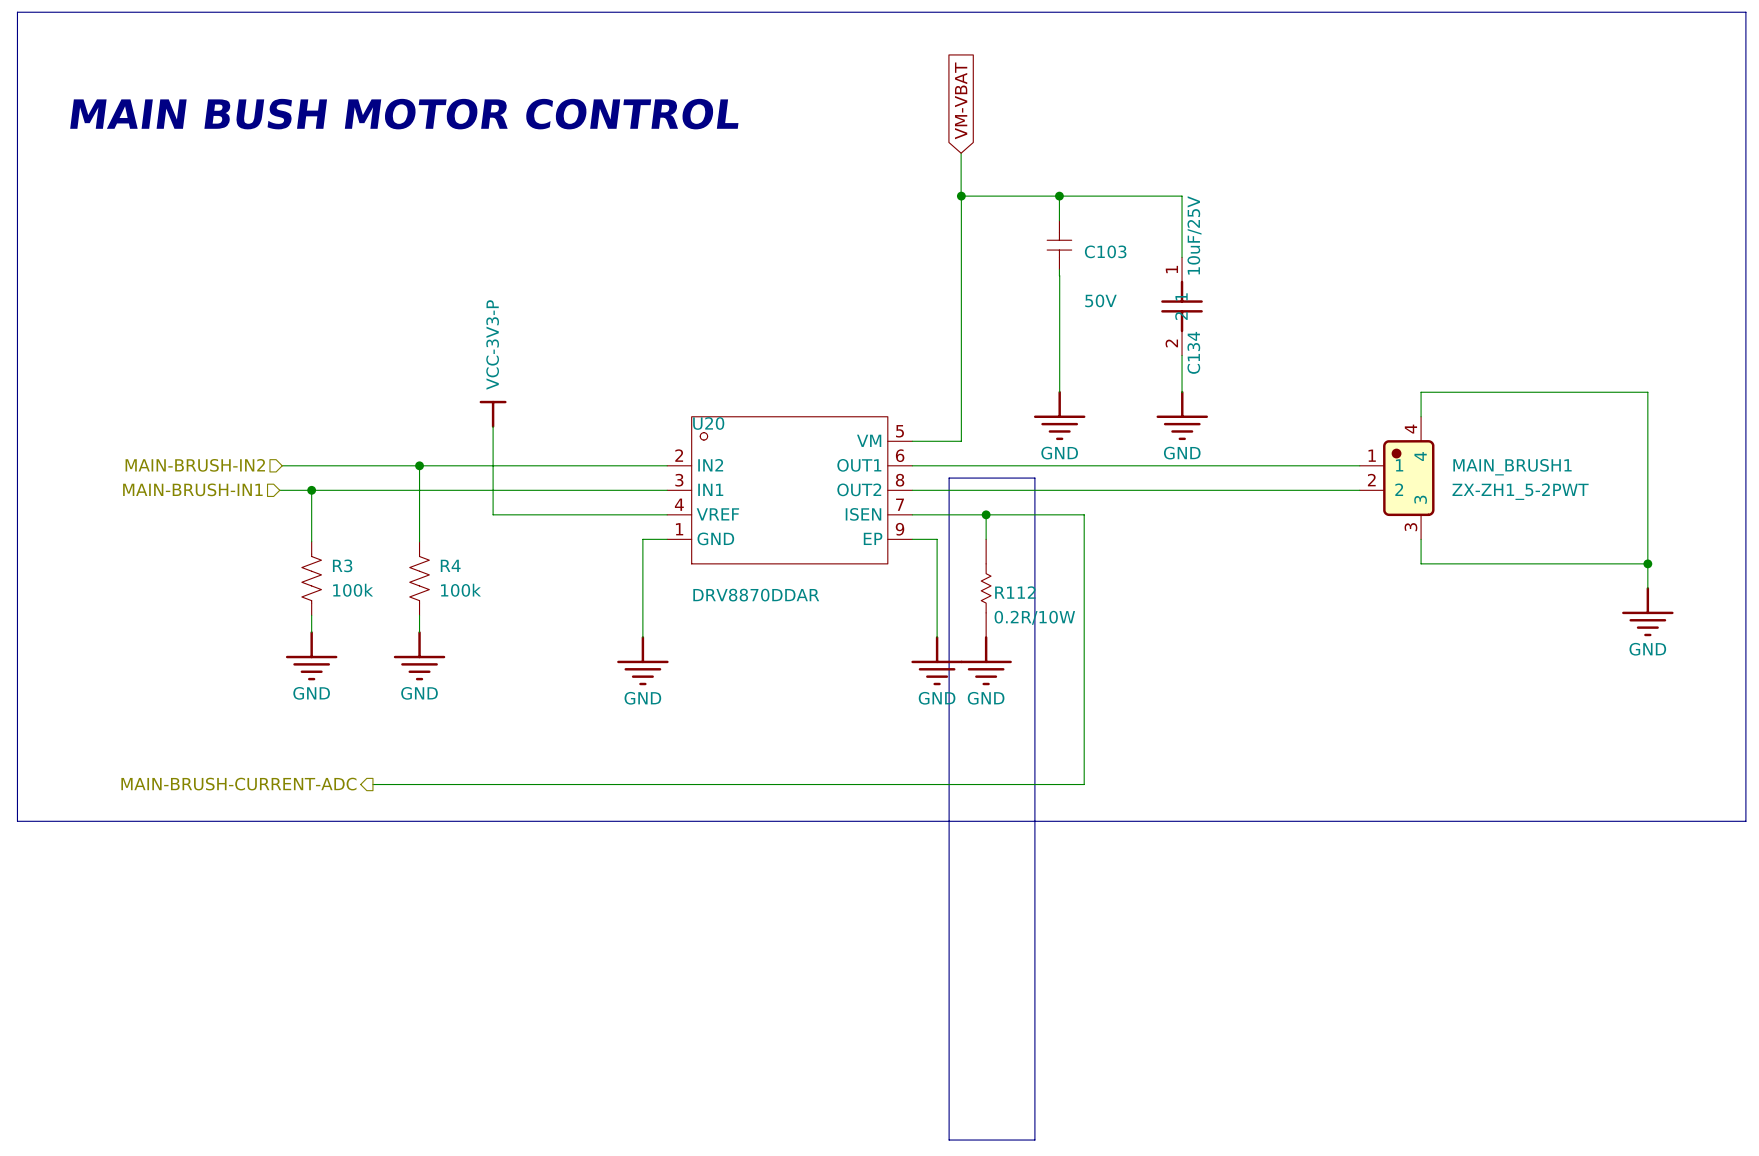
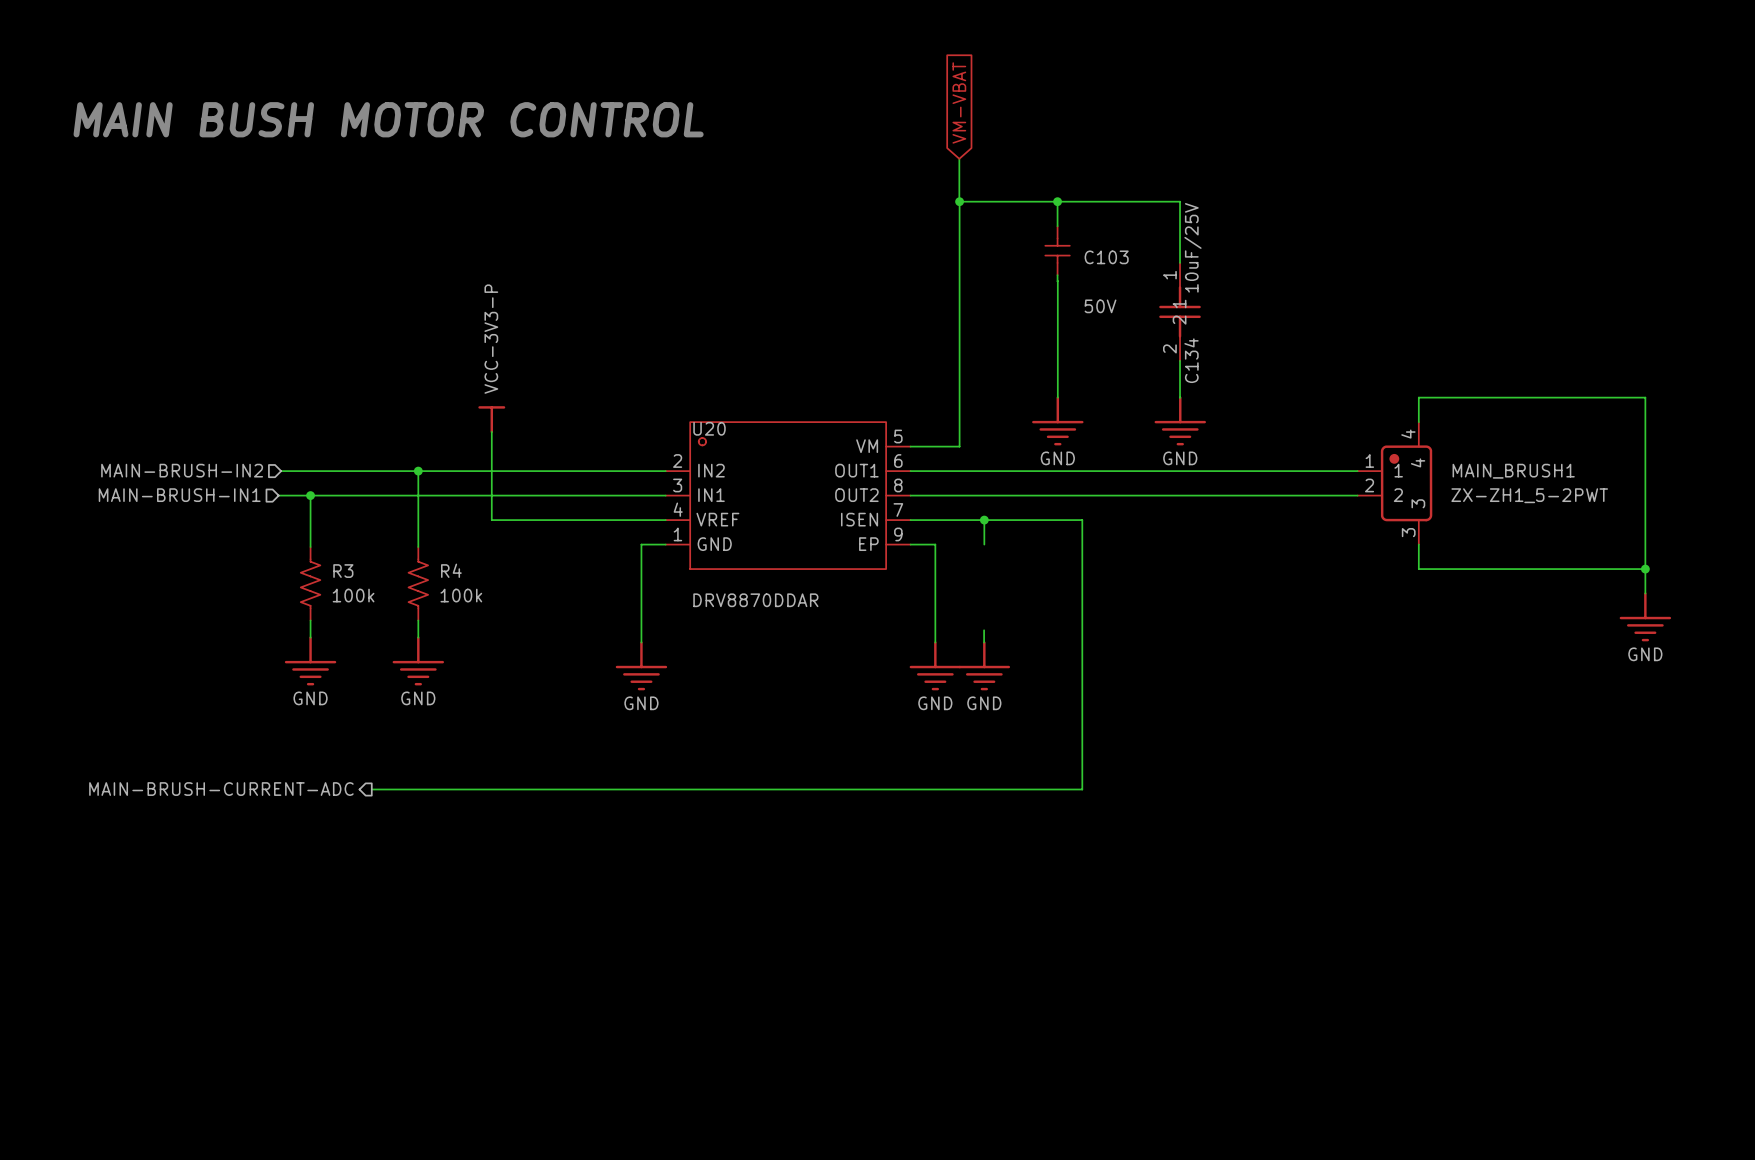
line: (17, 12) (1745, 12) (1745, 821) (17, 821) (17, 12) -> none
line: (949, 478) (1034, 478) (1034, 1140) (949, 1140) (949, 478) -> none
R112: 0.2R/10W (986, 588) -> none

